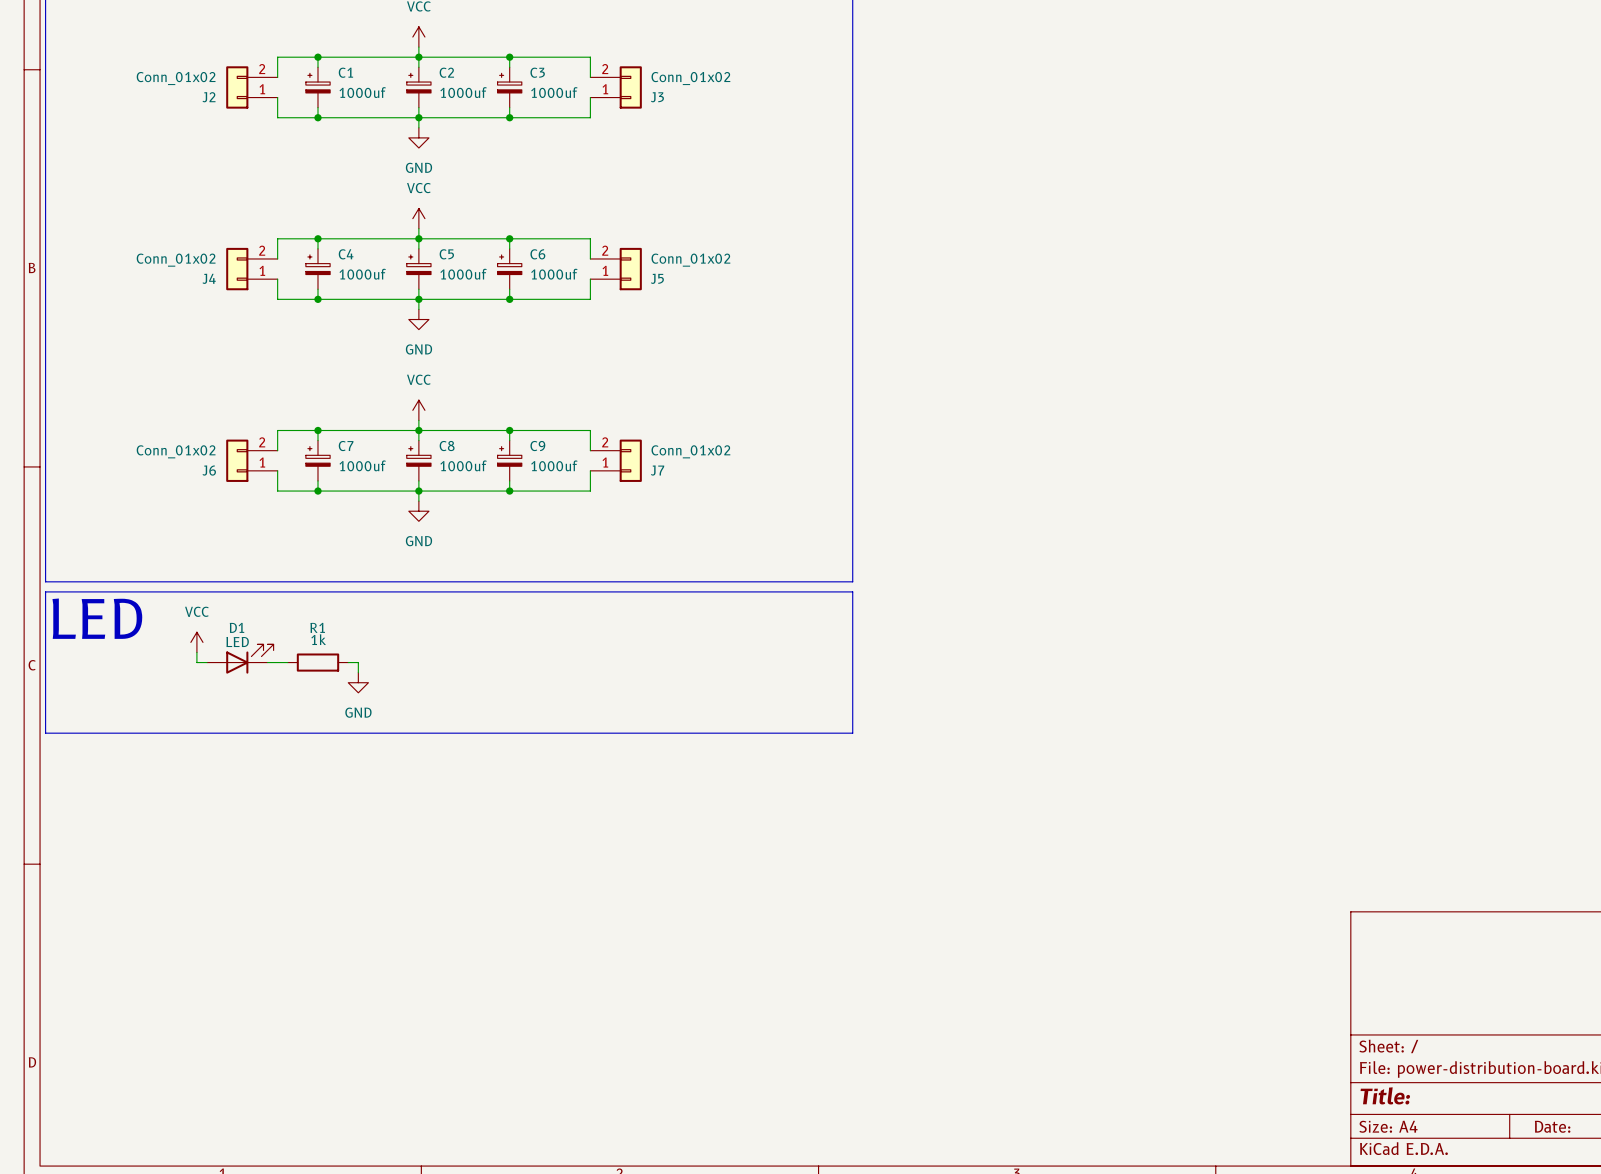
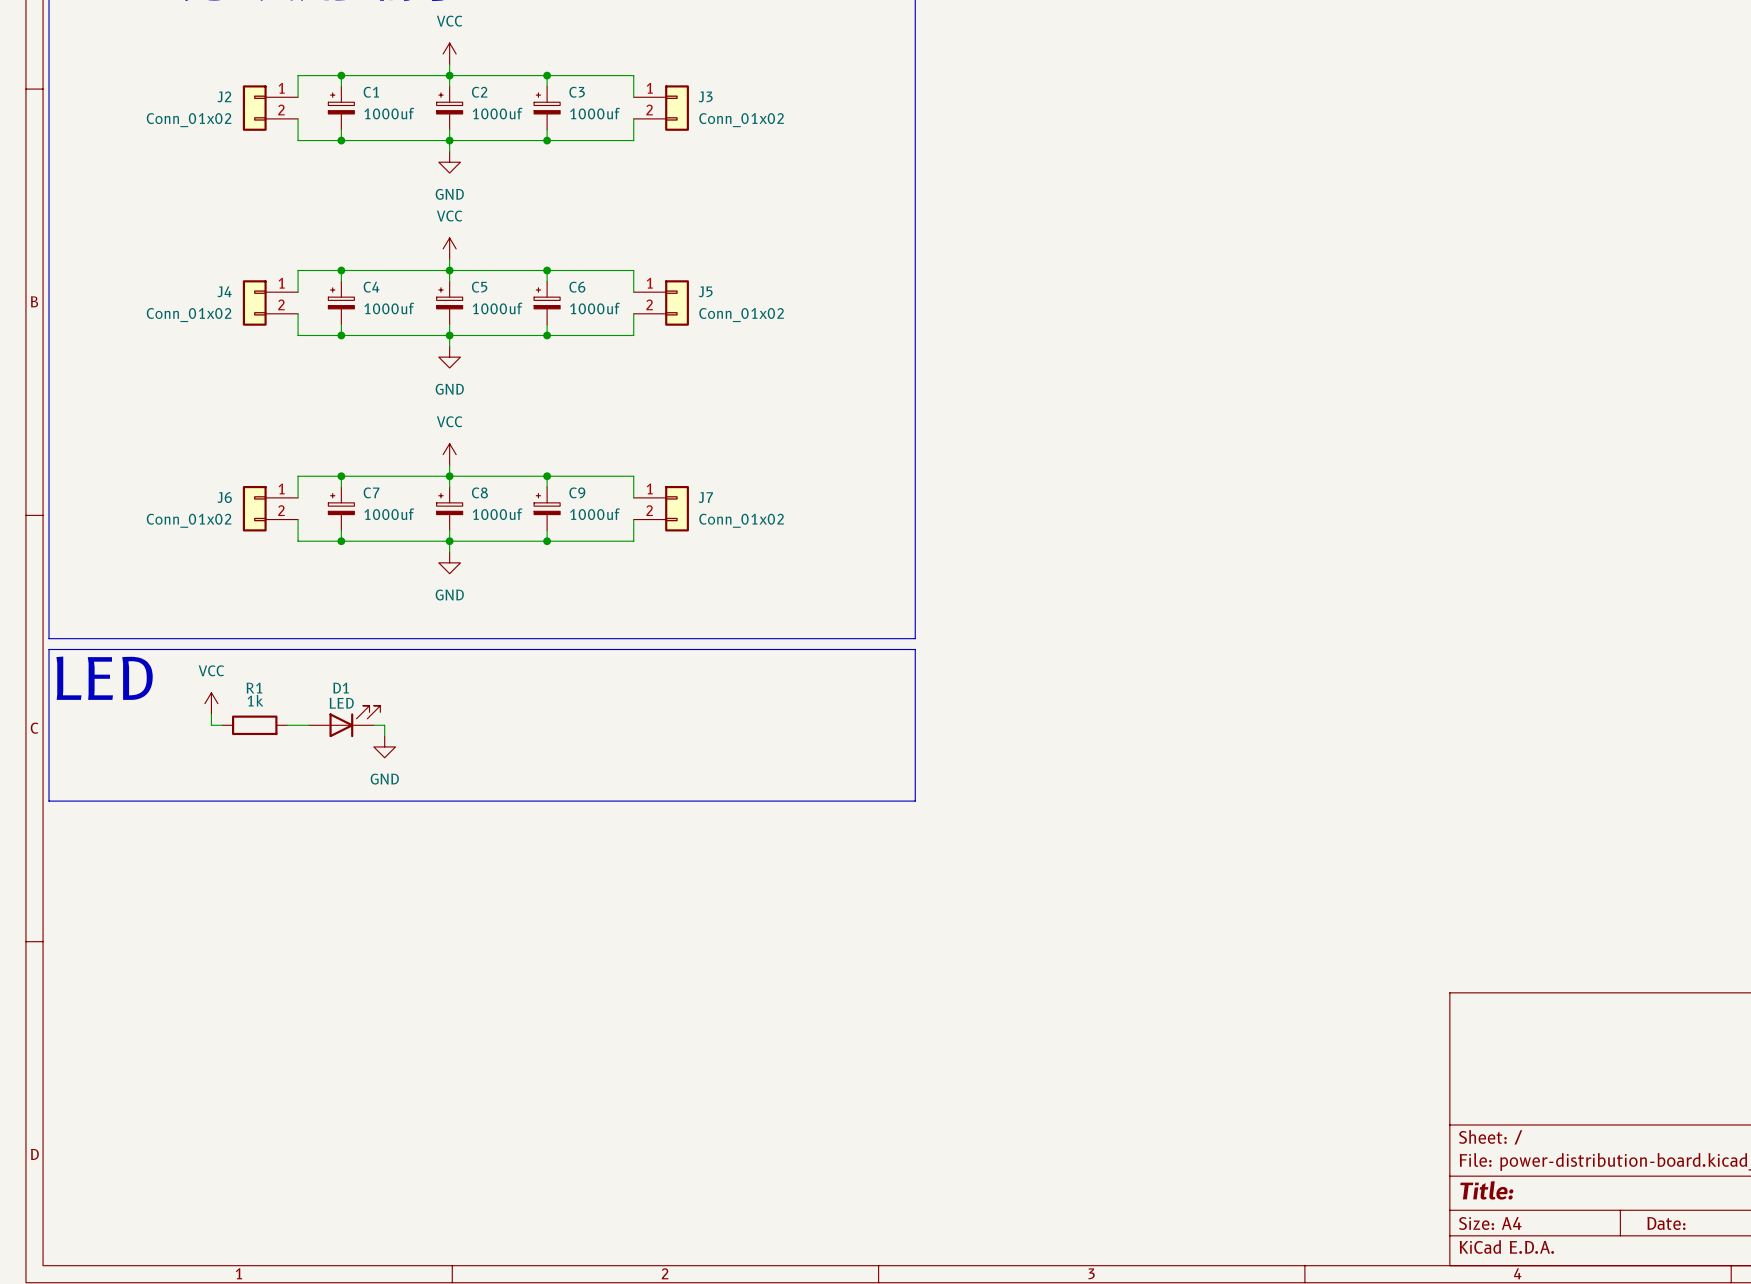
J2 flip: as is (237, 87) -> up-down (254, 108)
J3 flip: as is (630, 87) -> up-down (677, 108)
J4 flip: as is (237, 269) -> up-down (254, 302)
J5 flip: as is (630, 269) -> up-down (677, 302)
J6 flip: as is (237, 460) -> up-down (254, 508)
J7 flip: as is (630, 460) -> up-down (677, 508)
D1 position: (240, 659) -> (344, 721)
R1 position: (317, 662) -> (254, 725)

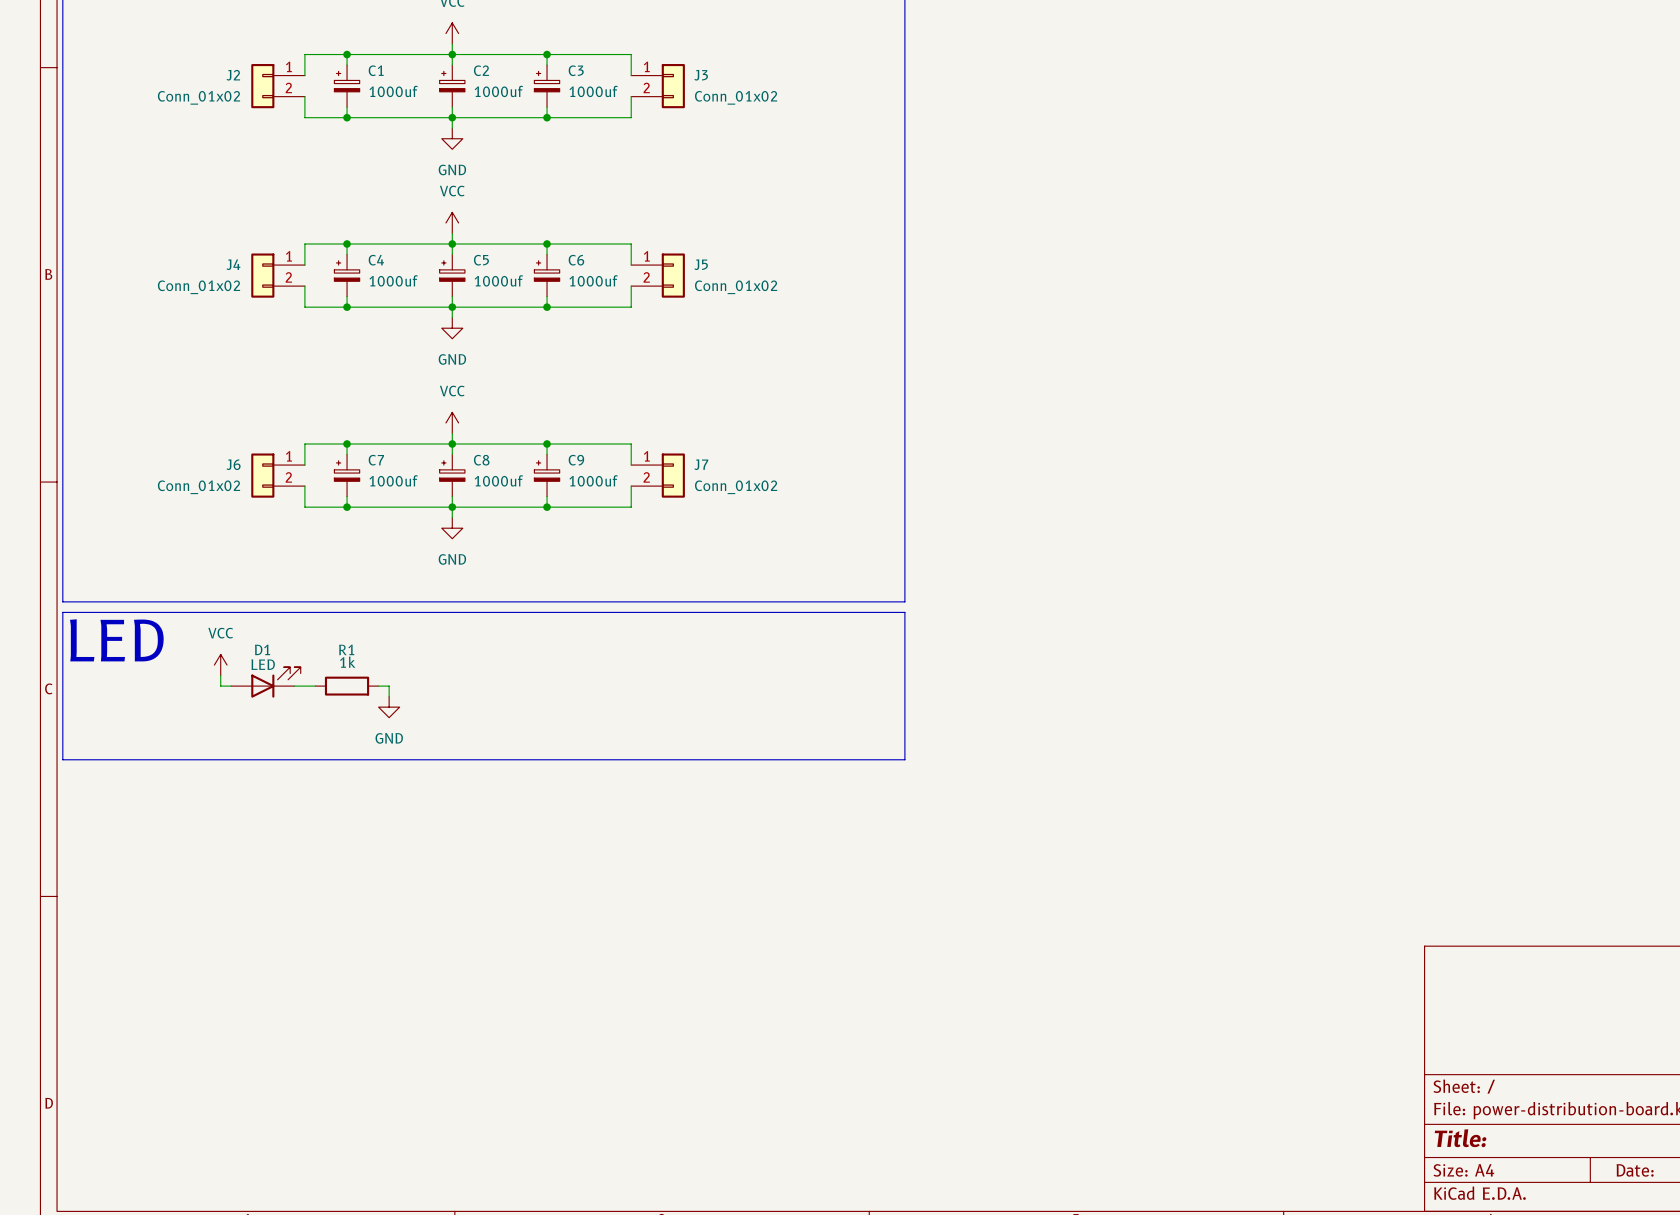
D1 position: (344, 721) -> (265, 682)
R1 position: (254, 725) -> (347, 686)

